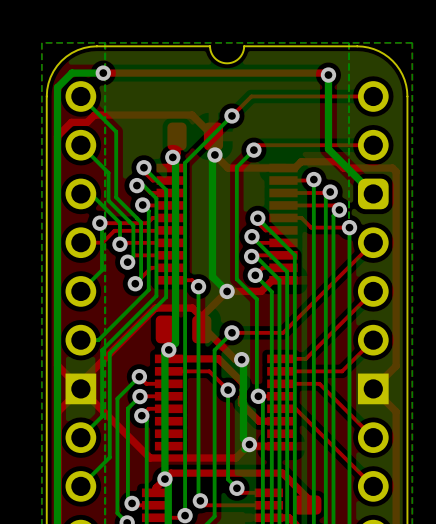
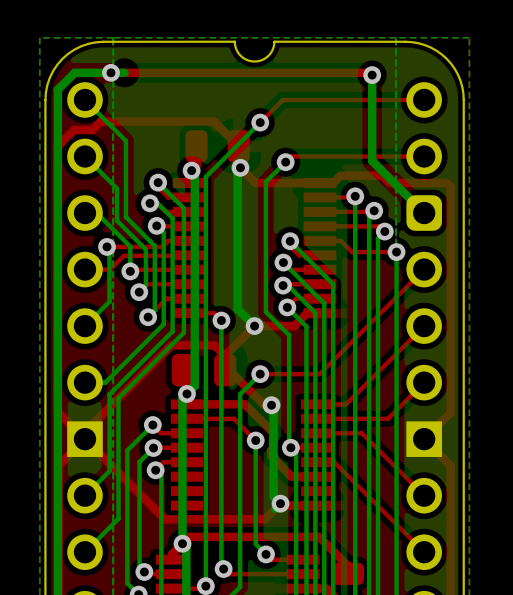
bottom track: none -> (124, 72) (111, 72)

